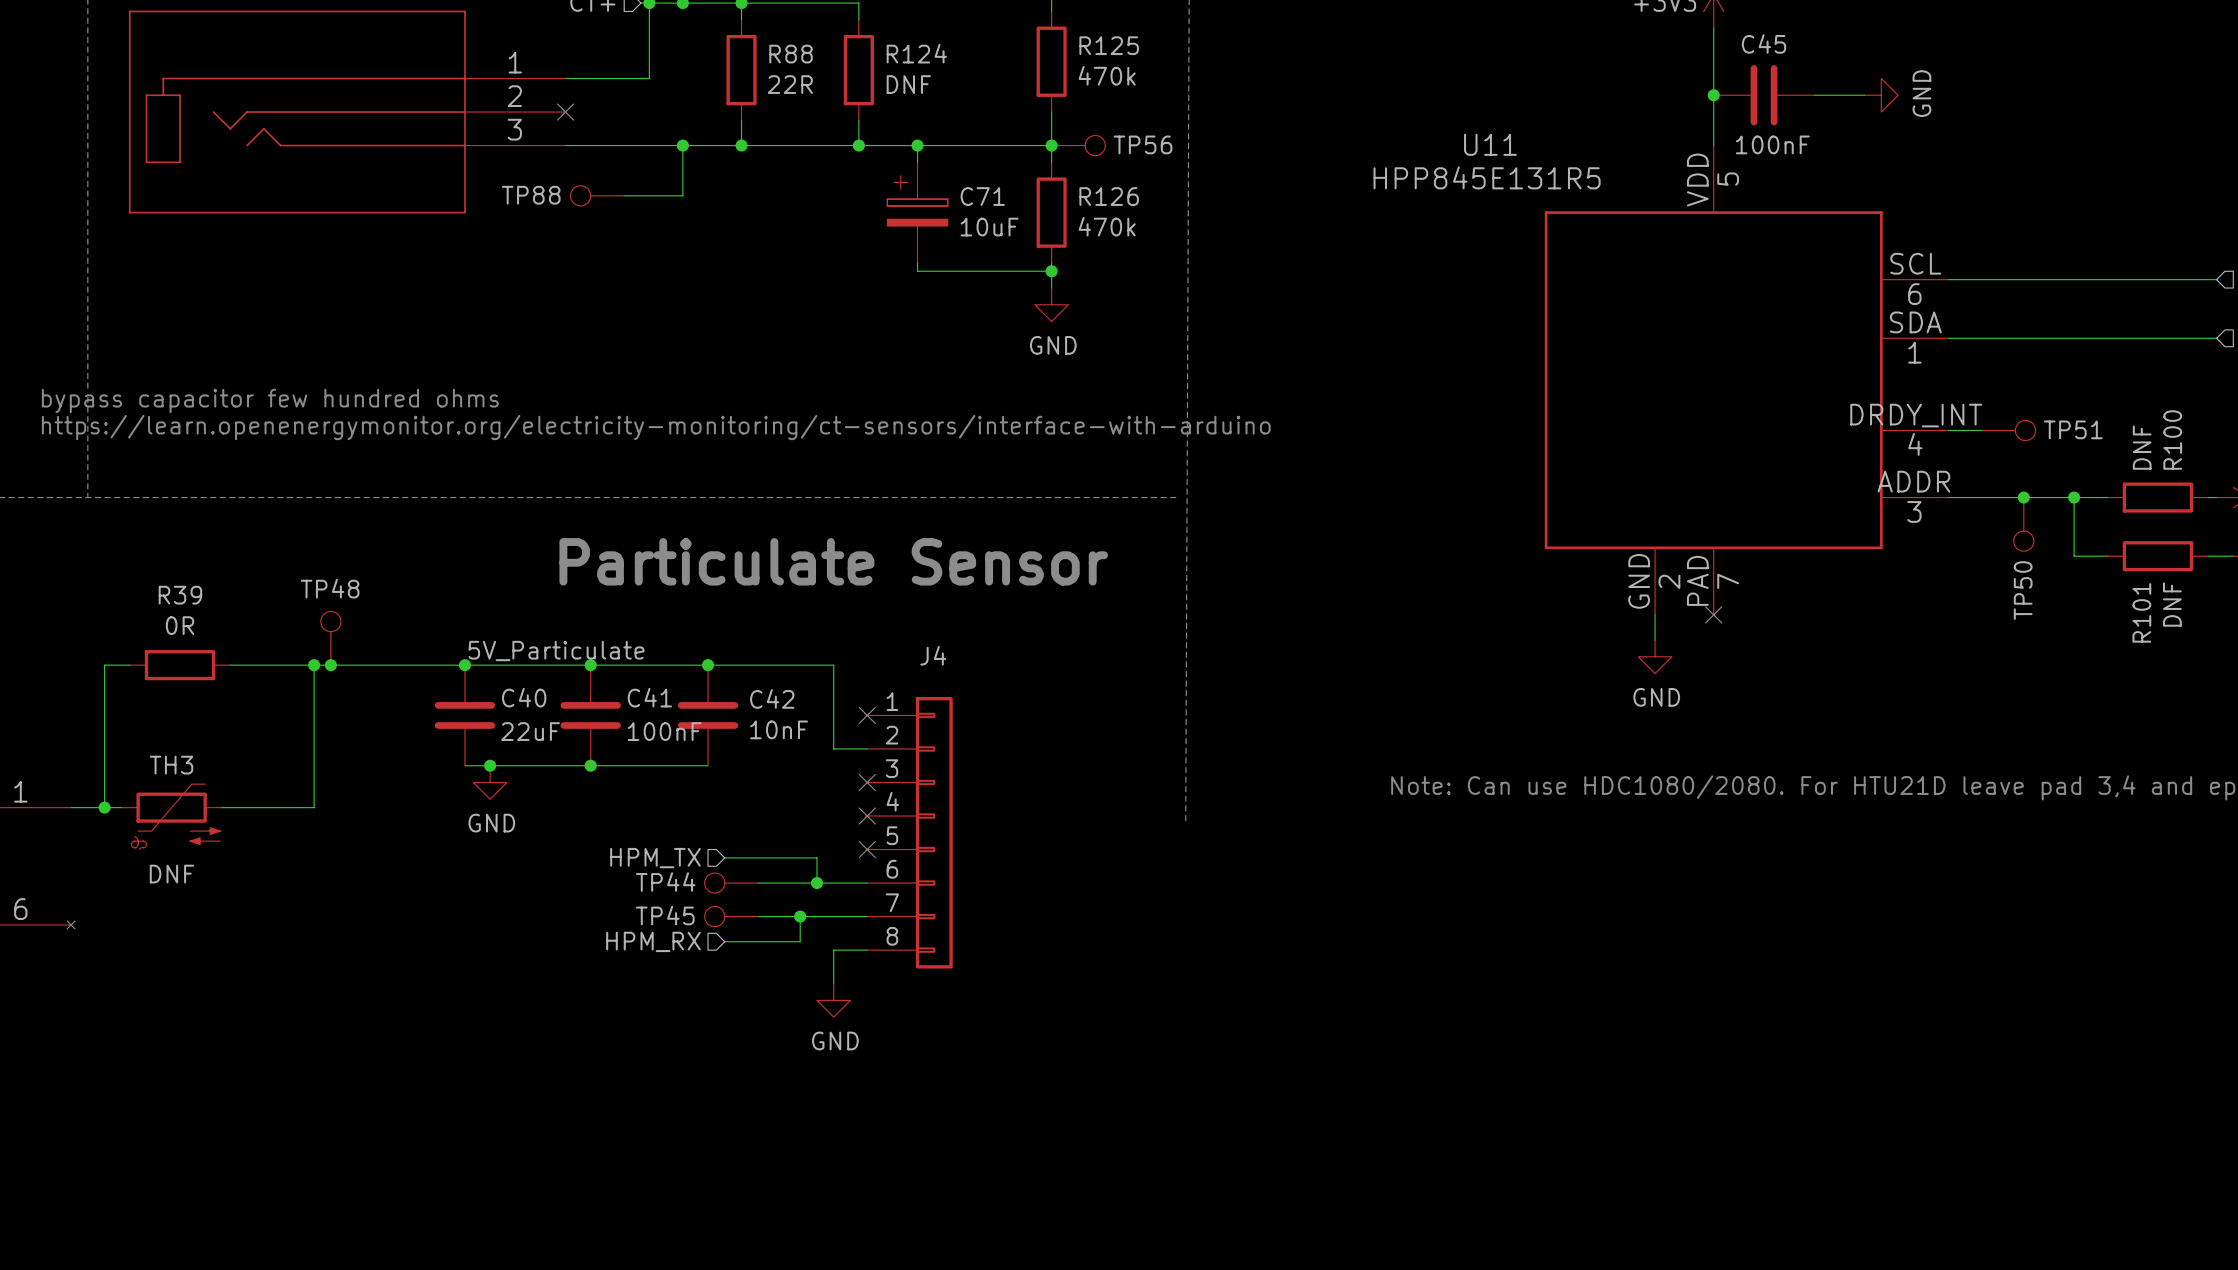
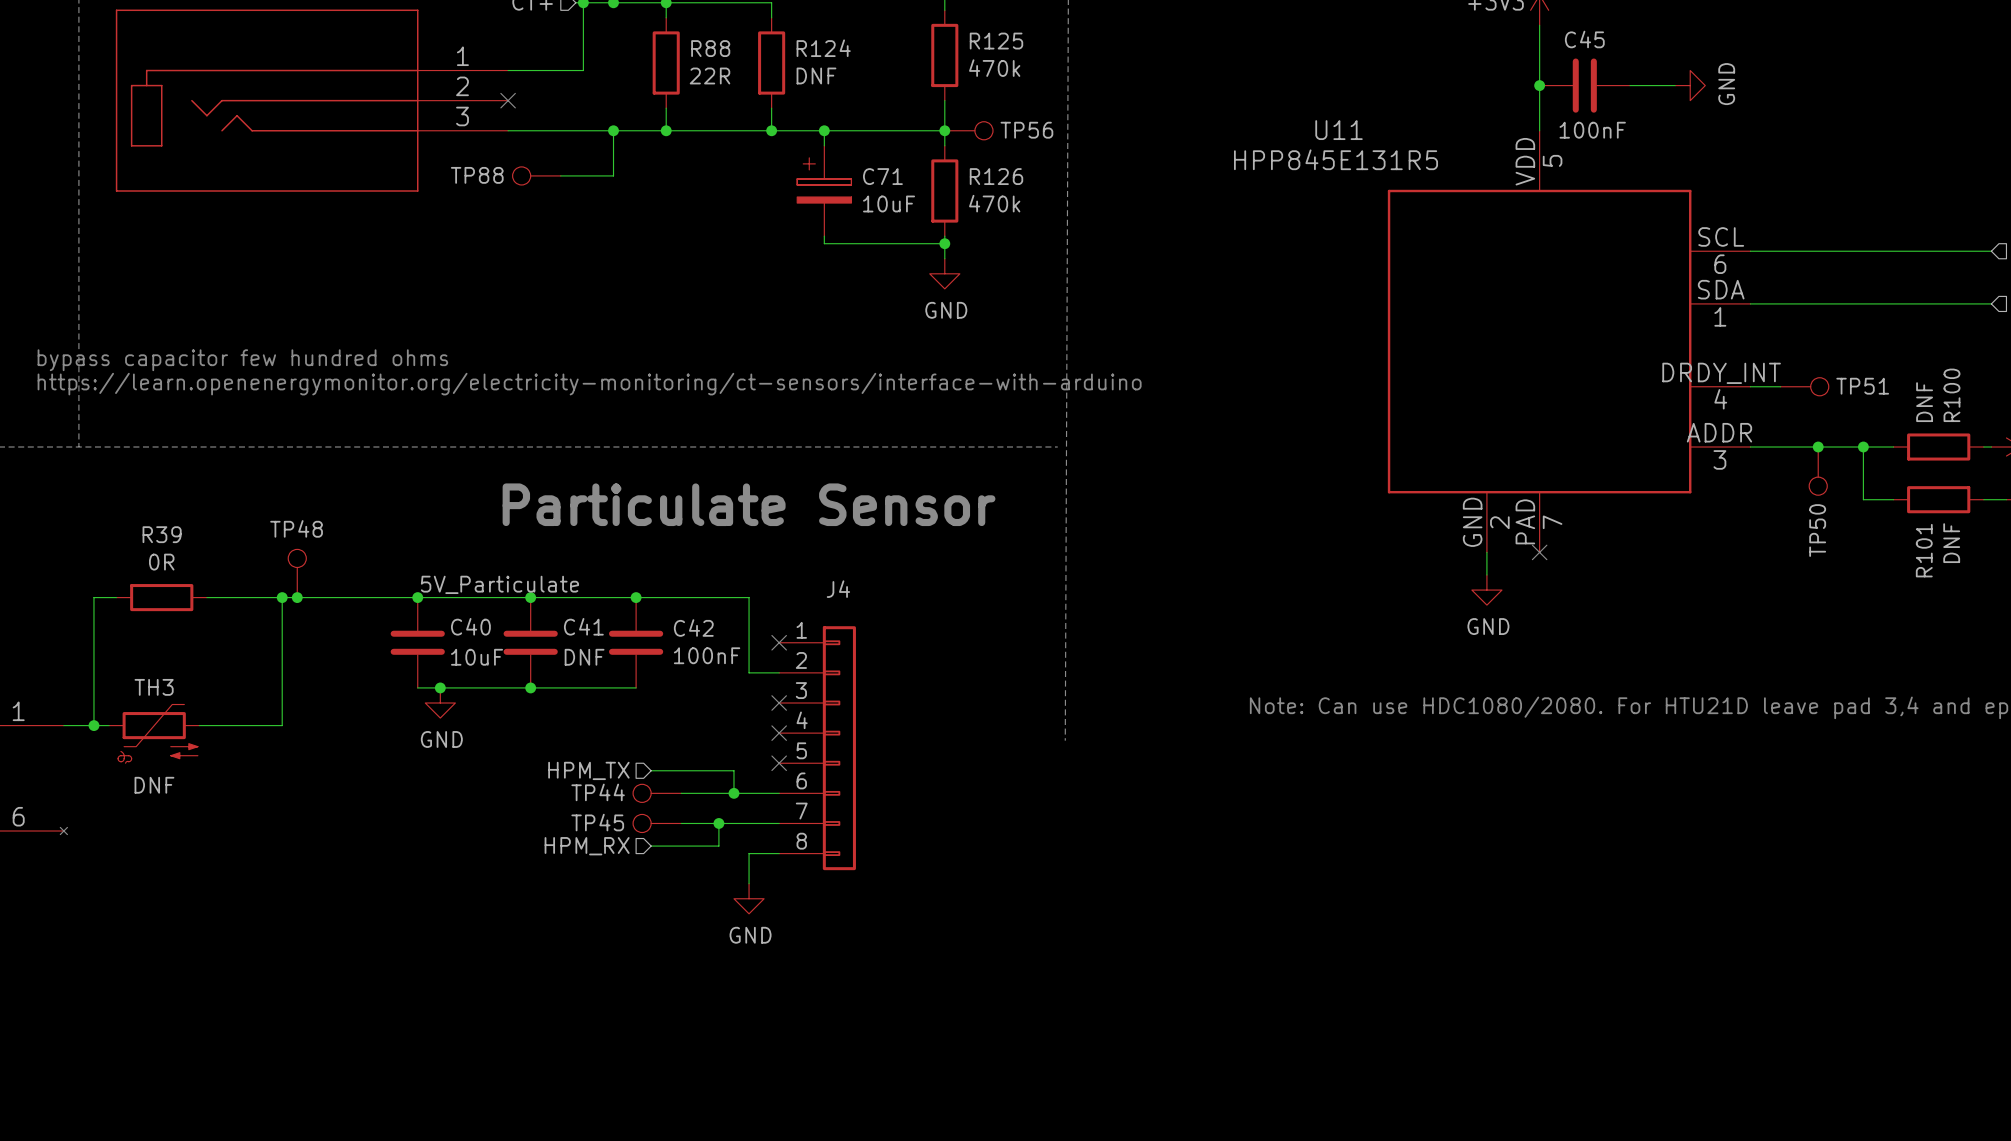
C42 value: 10nF (779, 729) -> 100nF (707, 655)
C40 value: 22uF (530, 731) -> 10uF (477, 657)
C41 value: 100nF (664, 731) -> DNF (584, 657)

